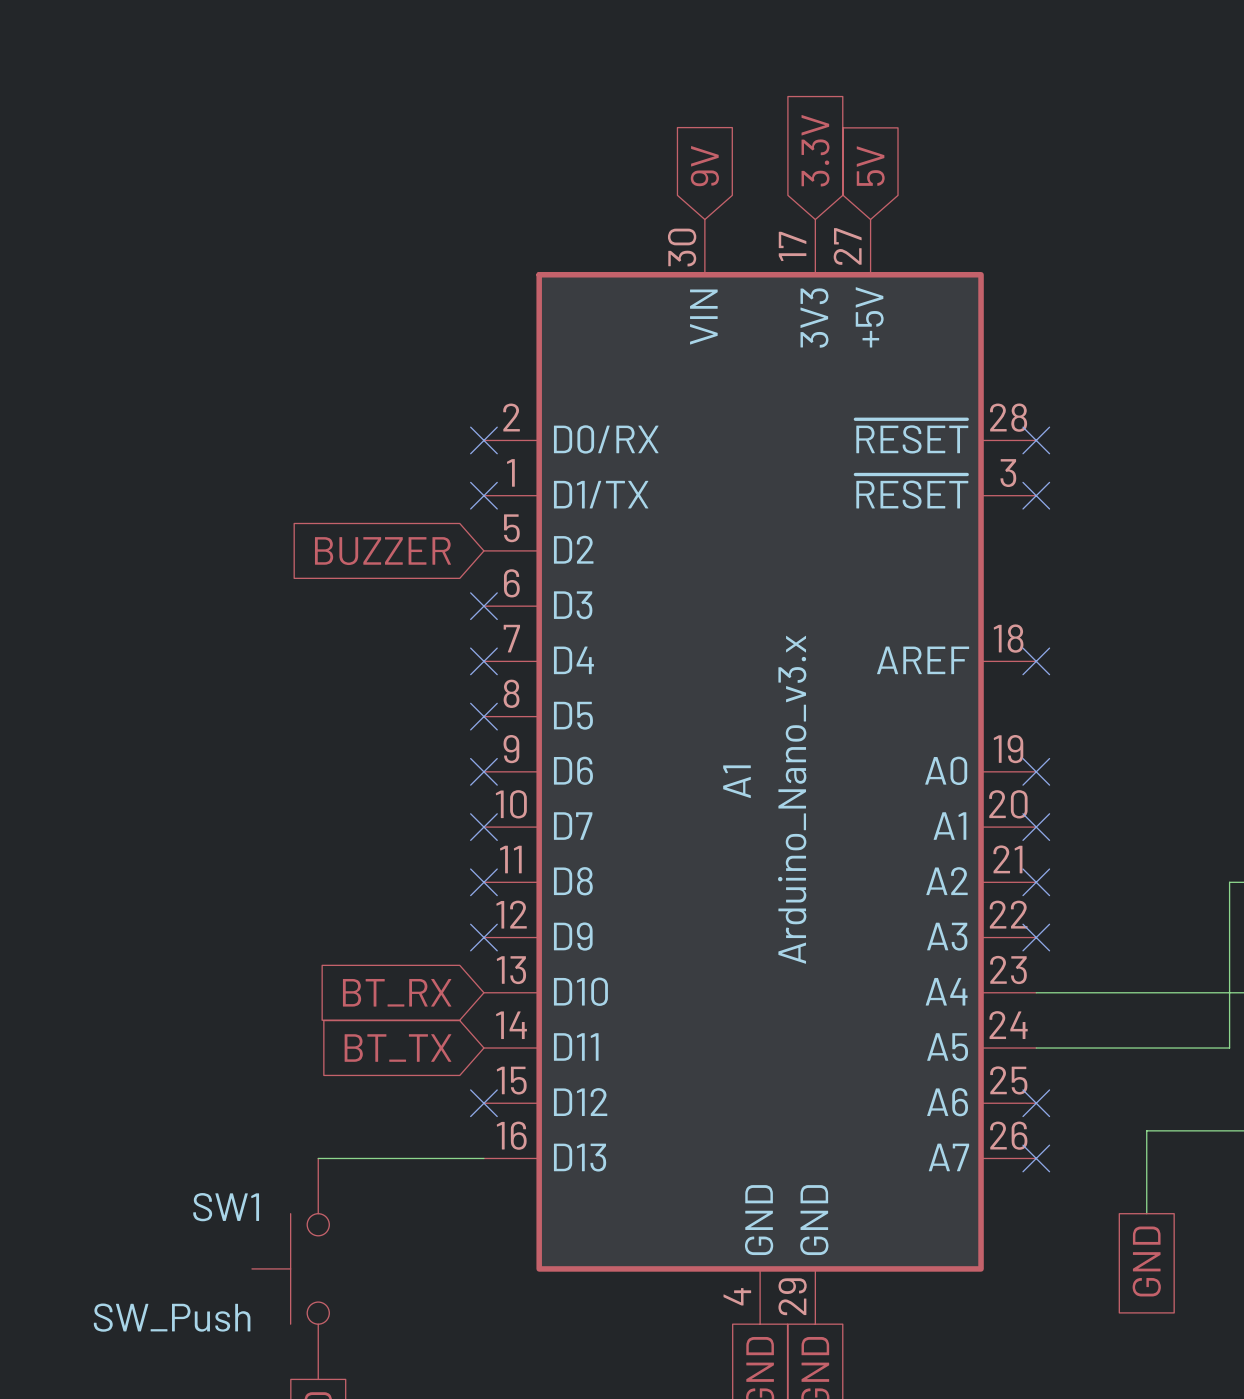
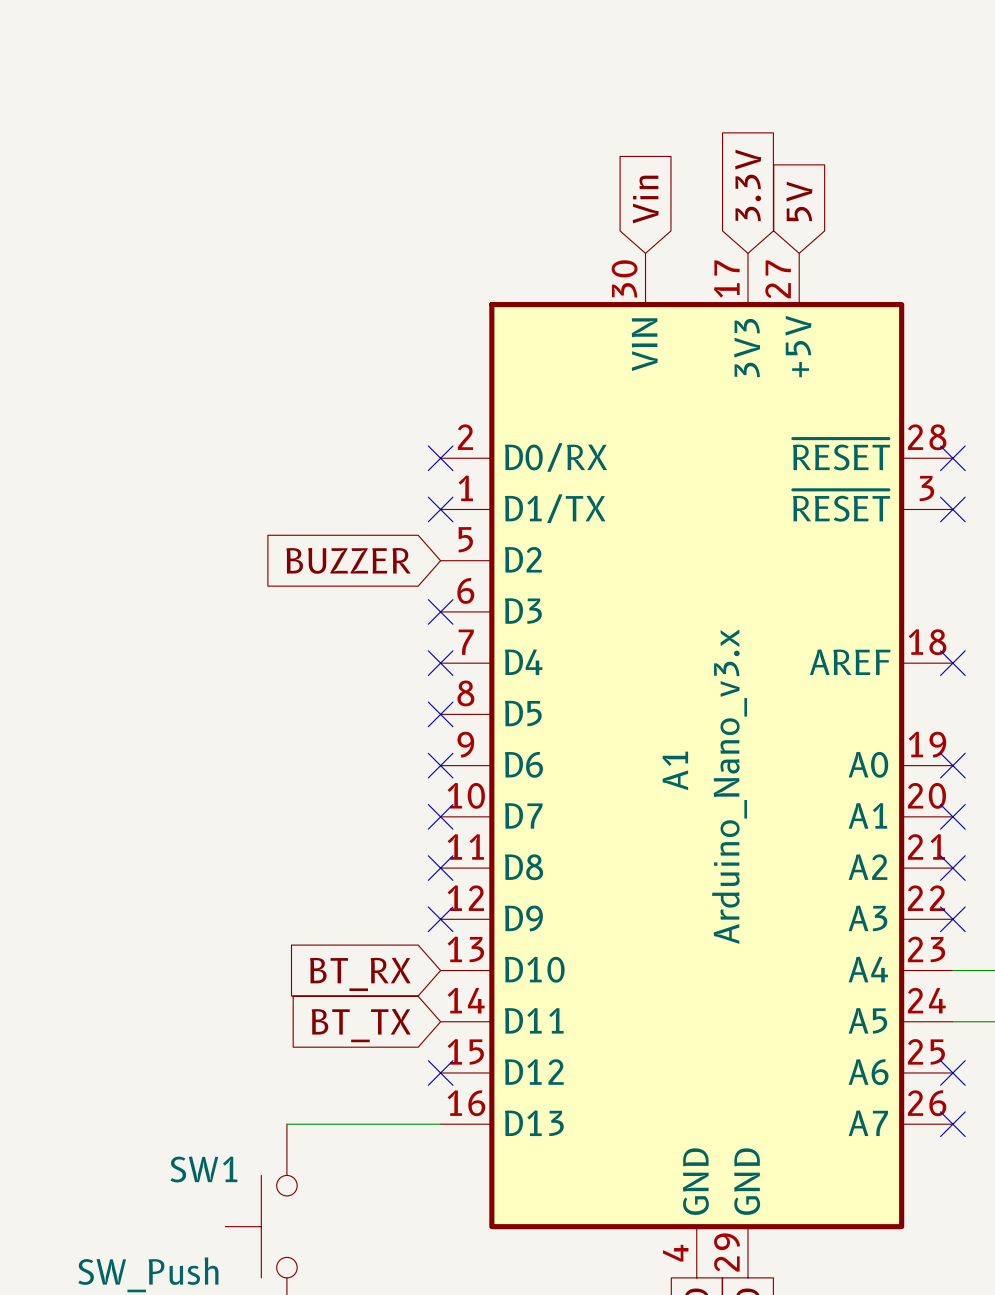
global label: 9V (704, 166) -> Vin (645, 199)

